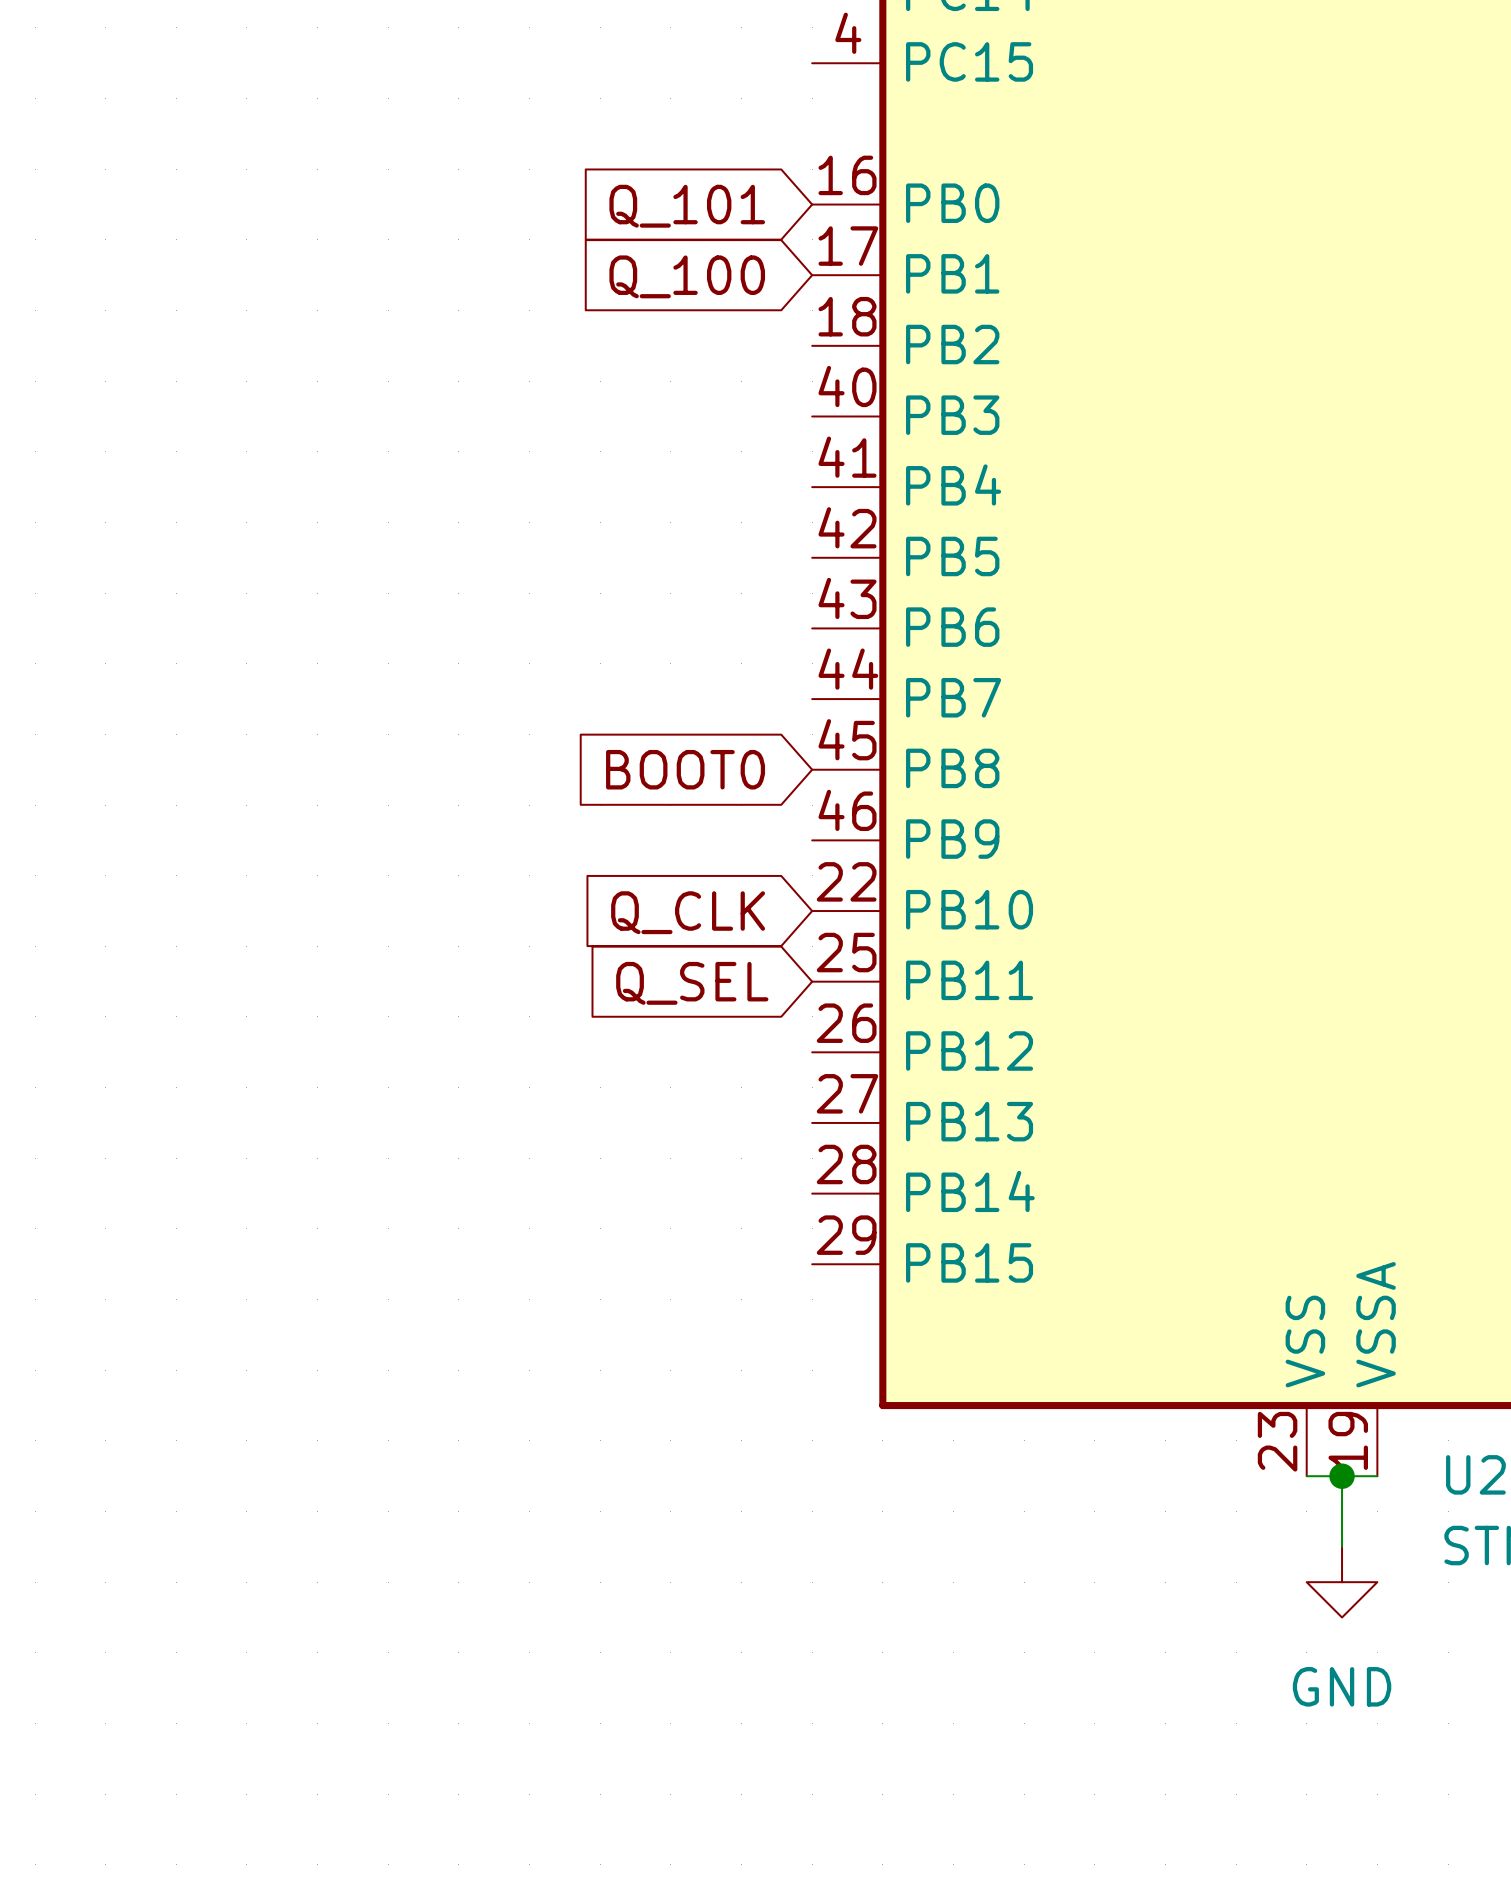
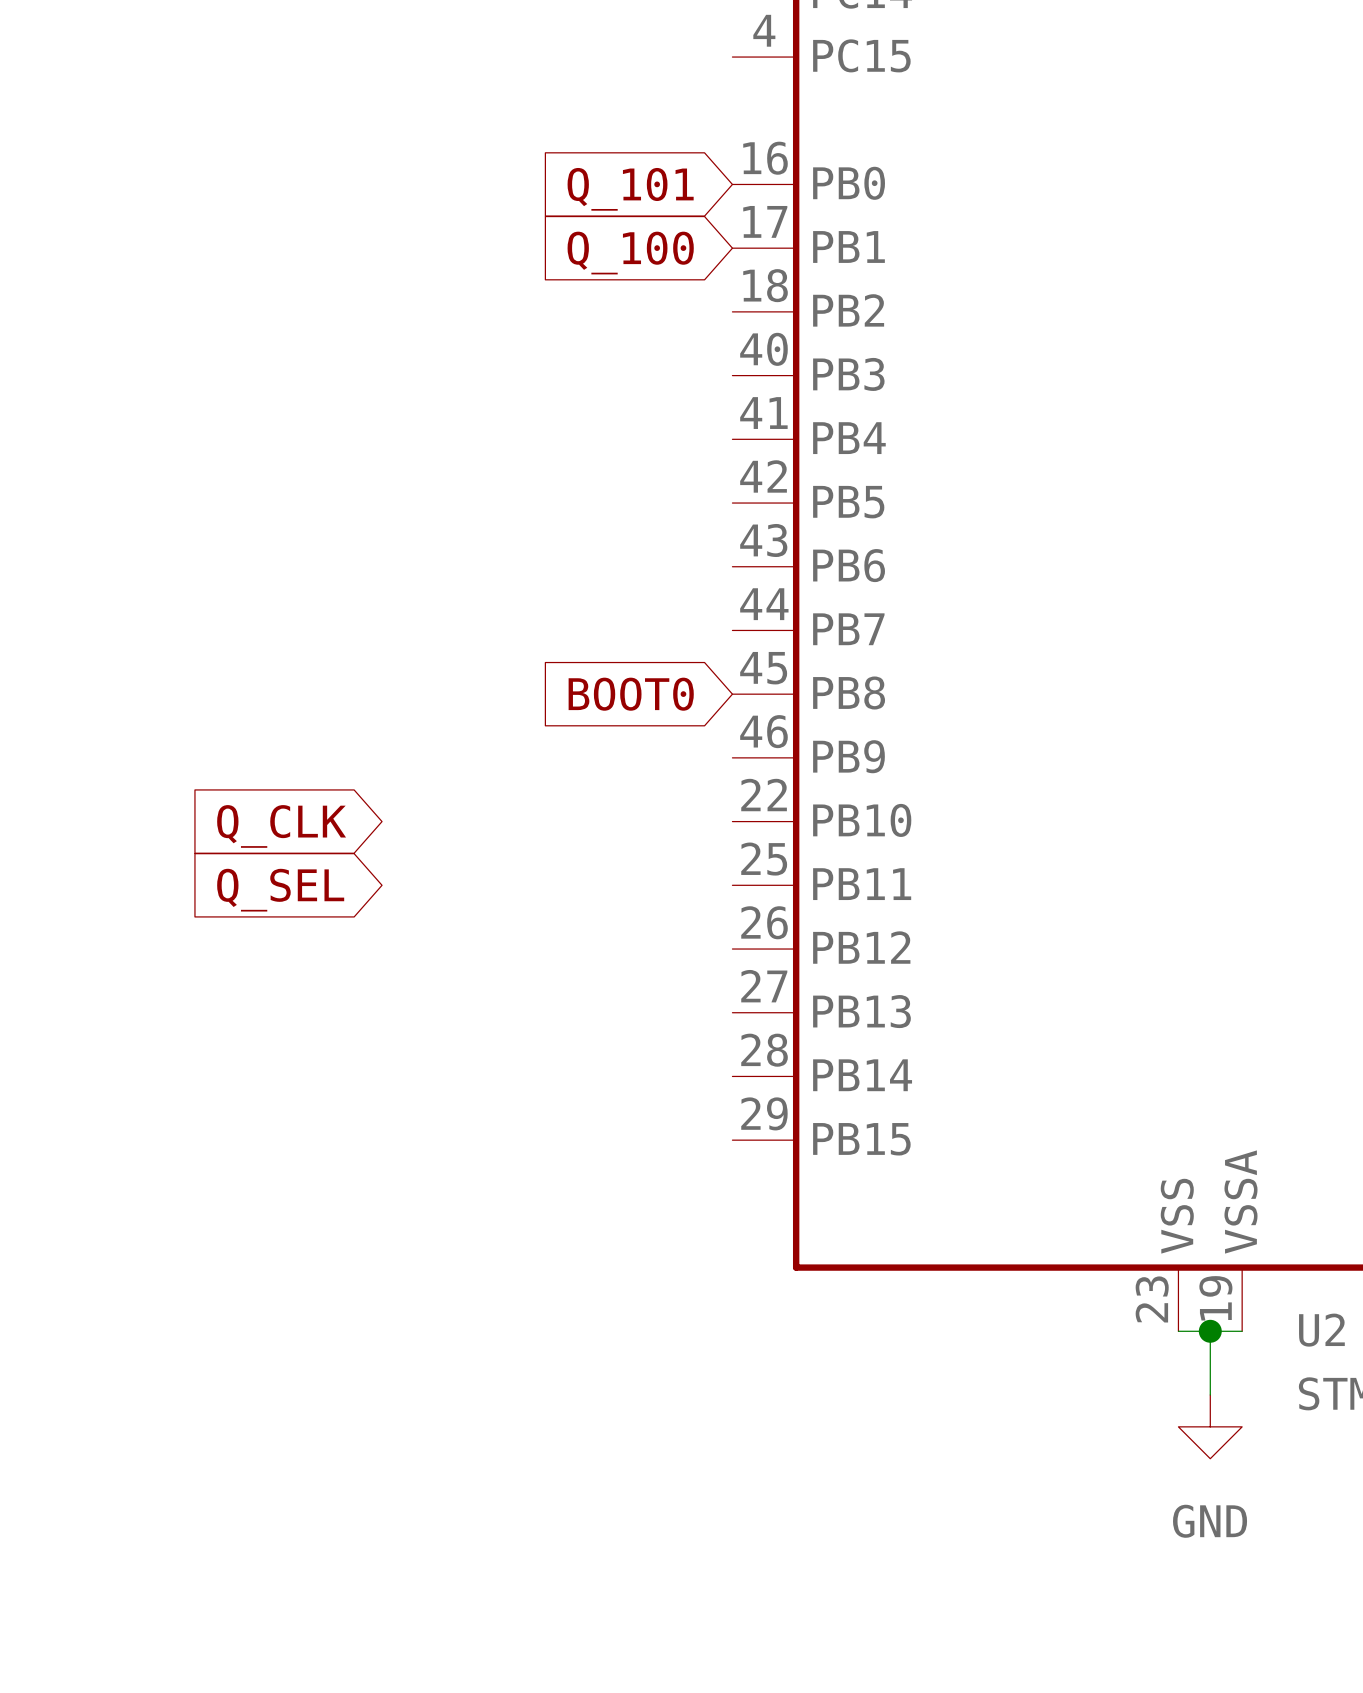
global label position: Q_CLK (688, 912) -> Q_CLK (281, 826)
global label position: Q_SEL (692, 983) -> Q_SEL (280, 890)

